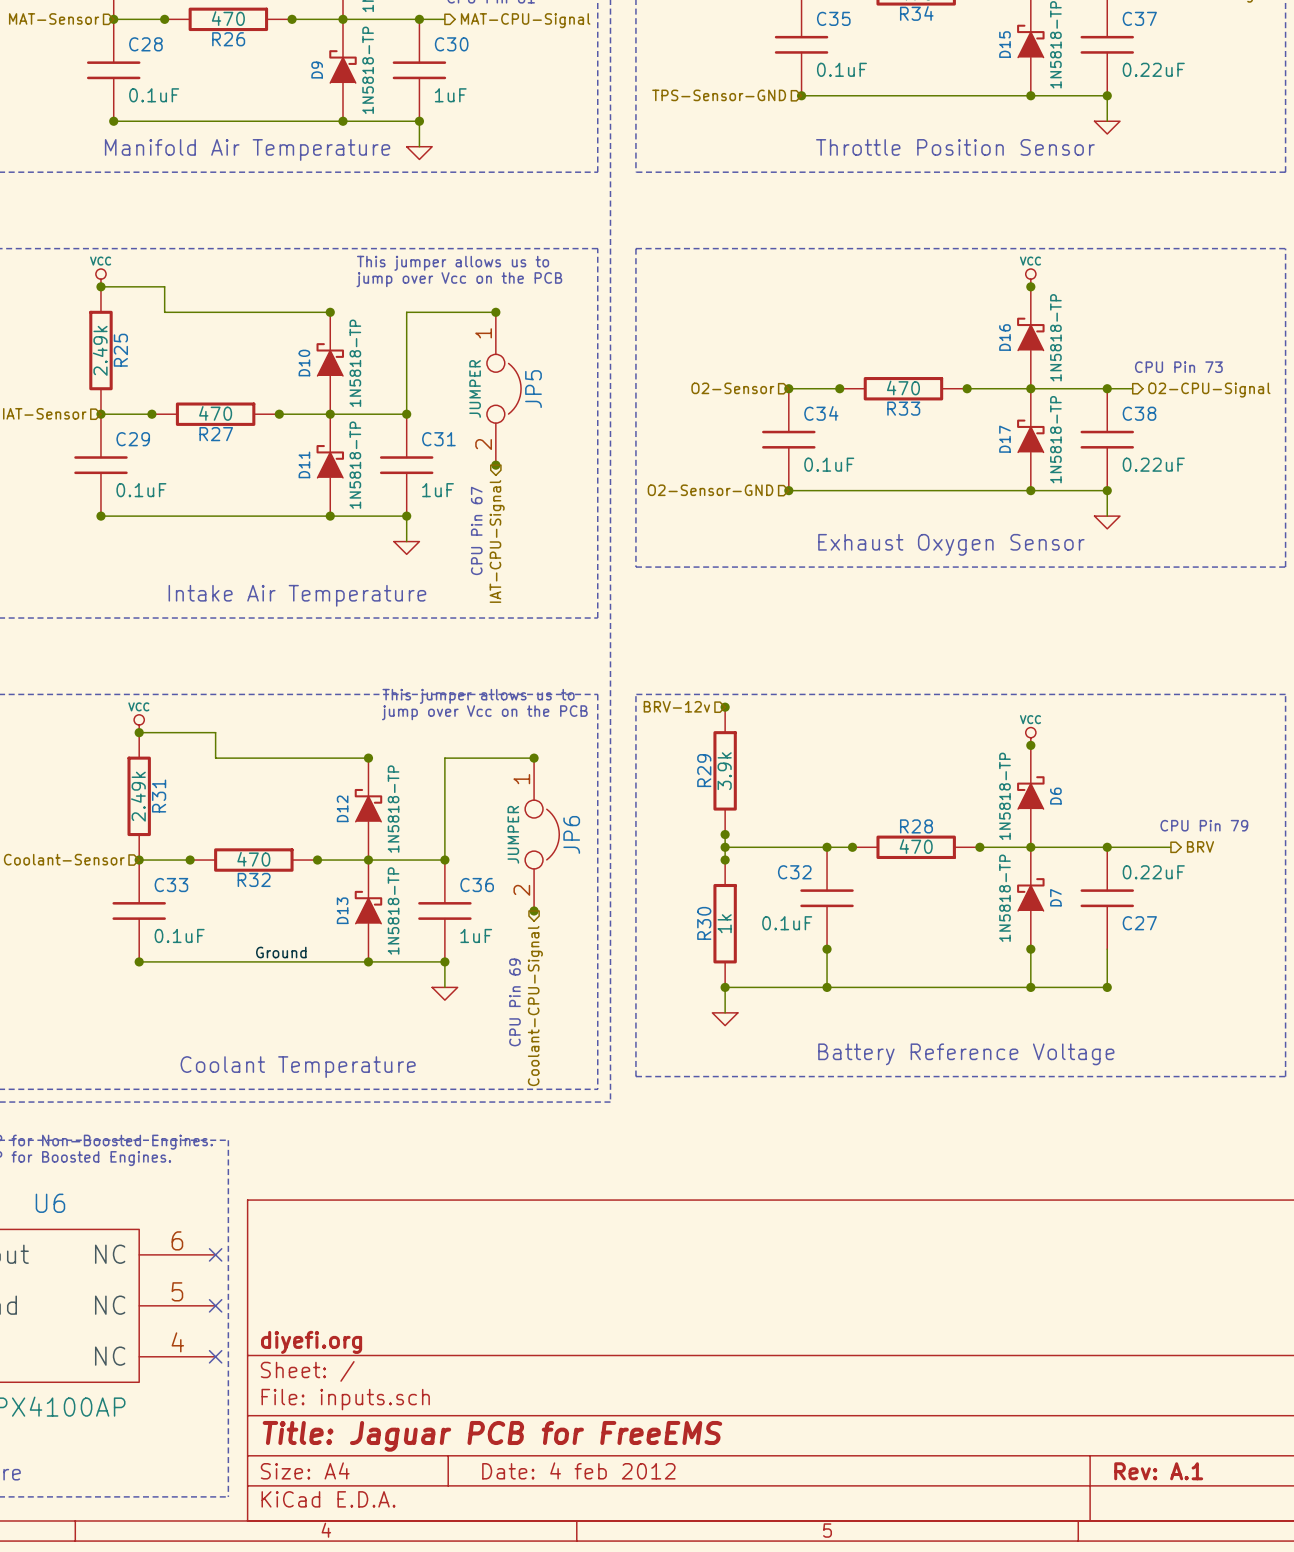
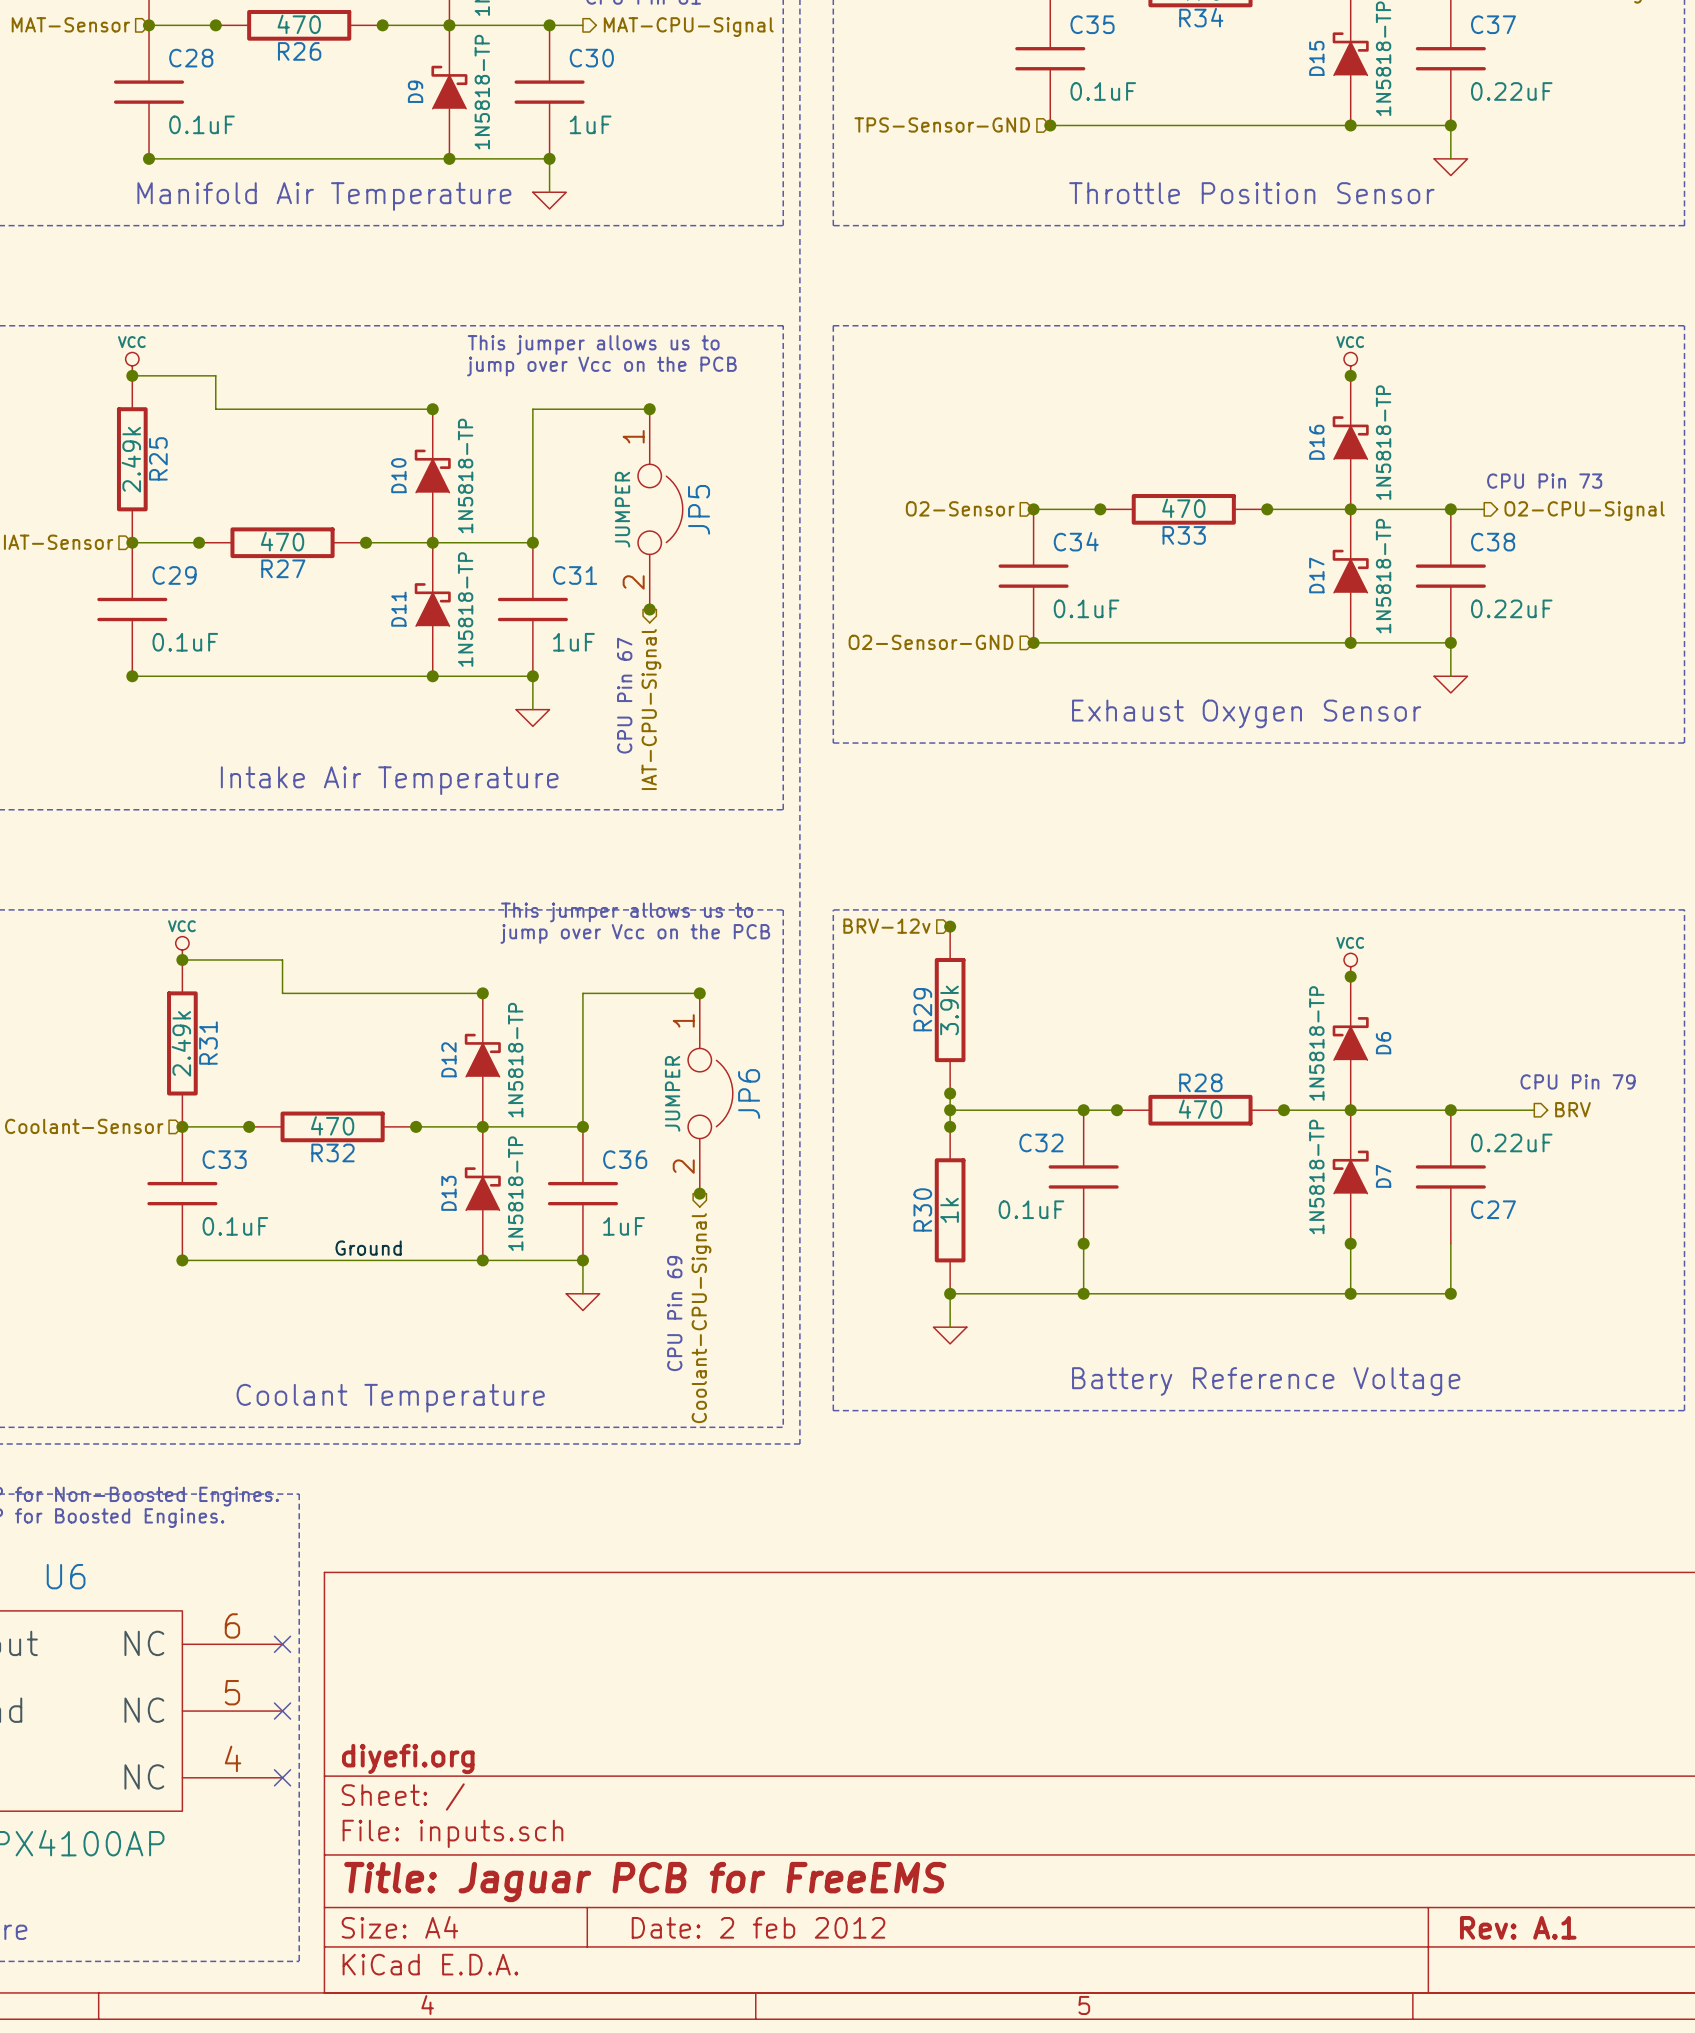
title block: Date: 4 feb 2012 (578, 1470) -> Date: 2 feb 2012 (758, 1927)

